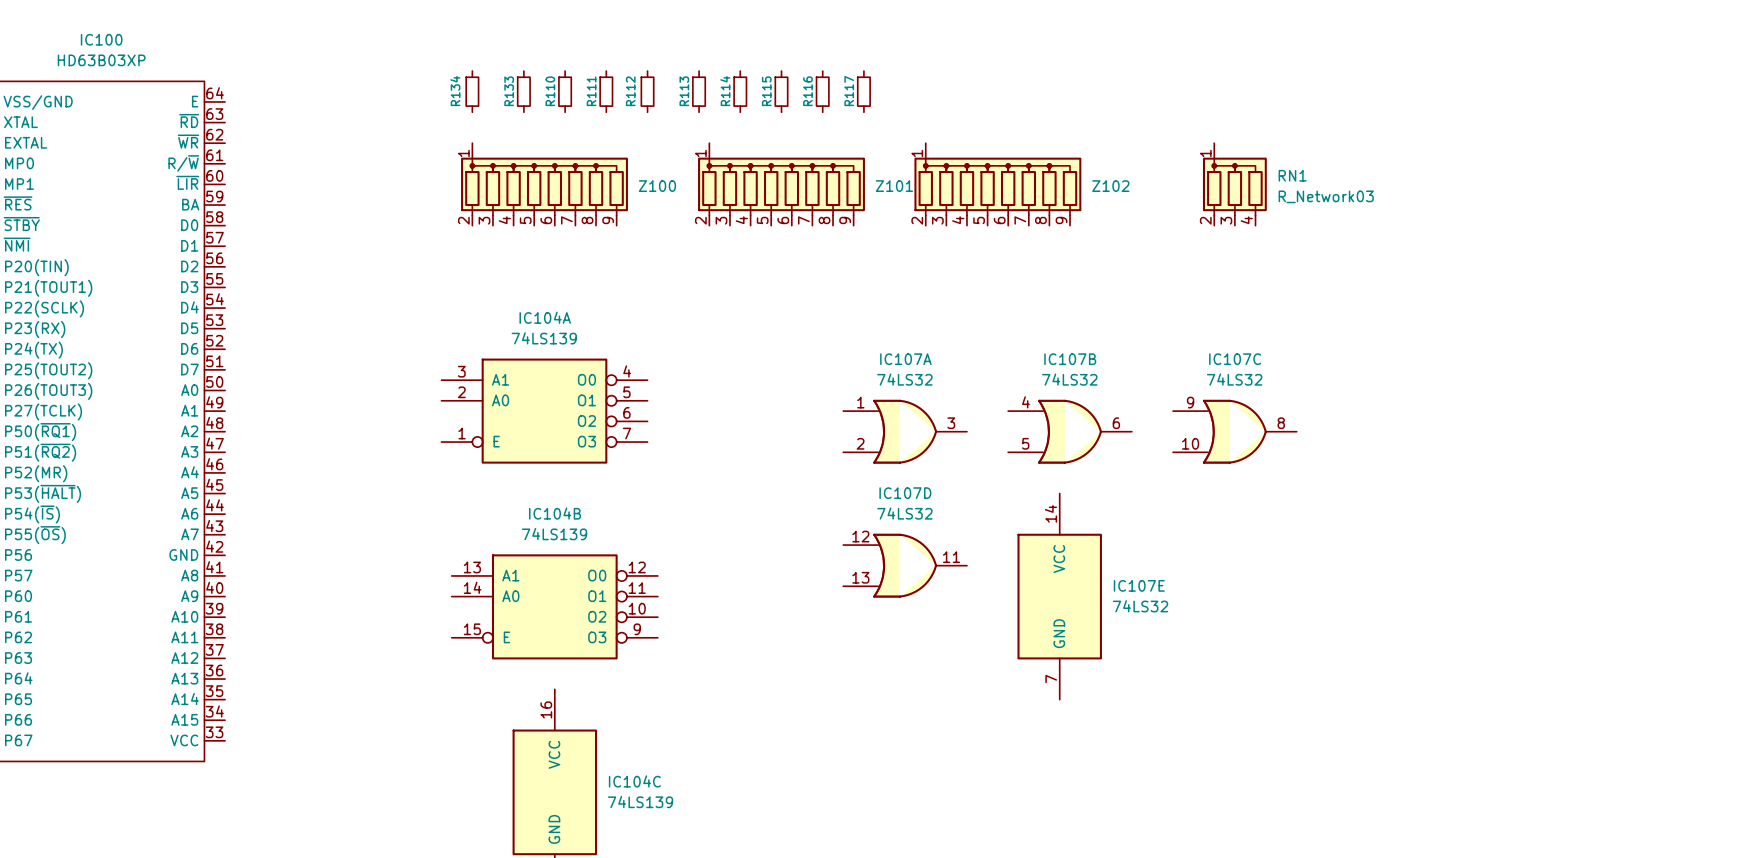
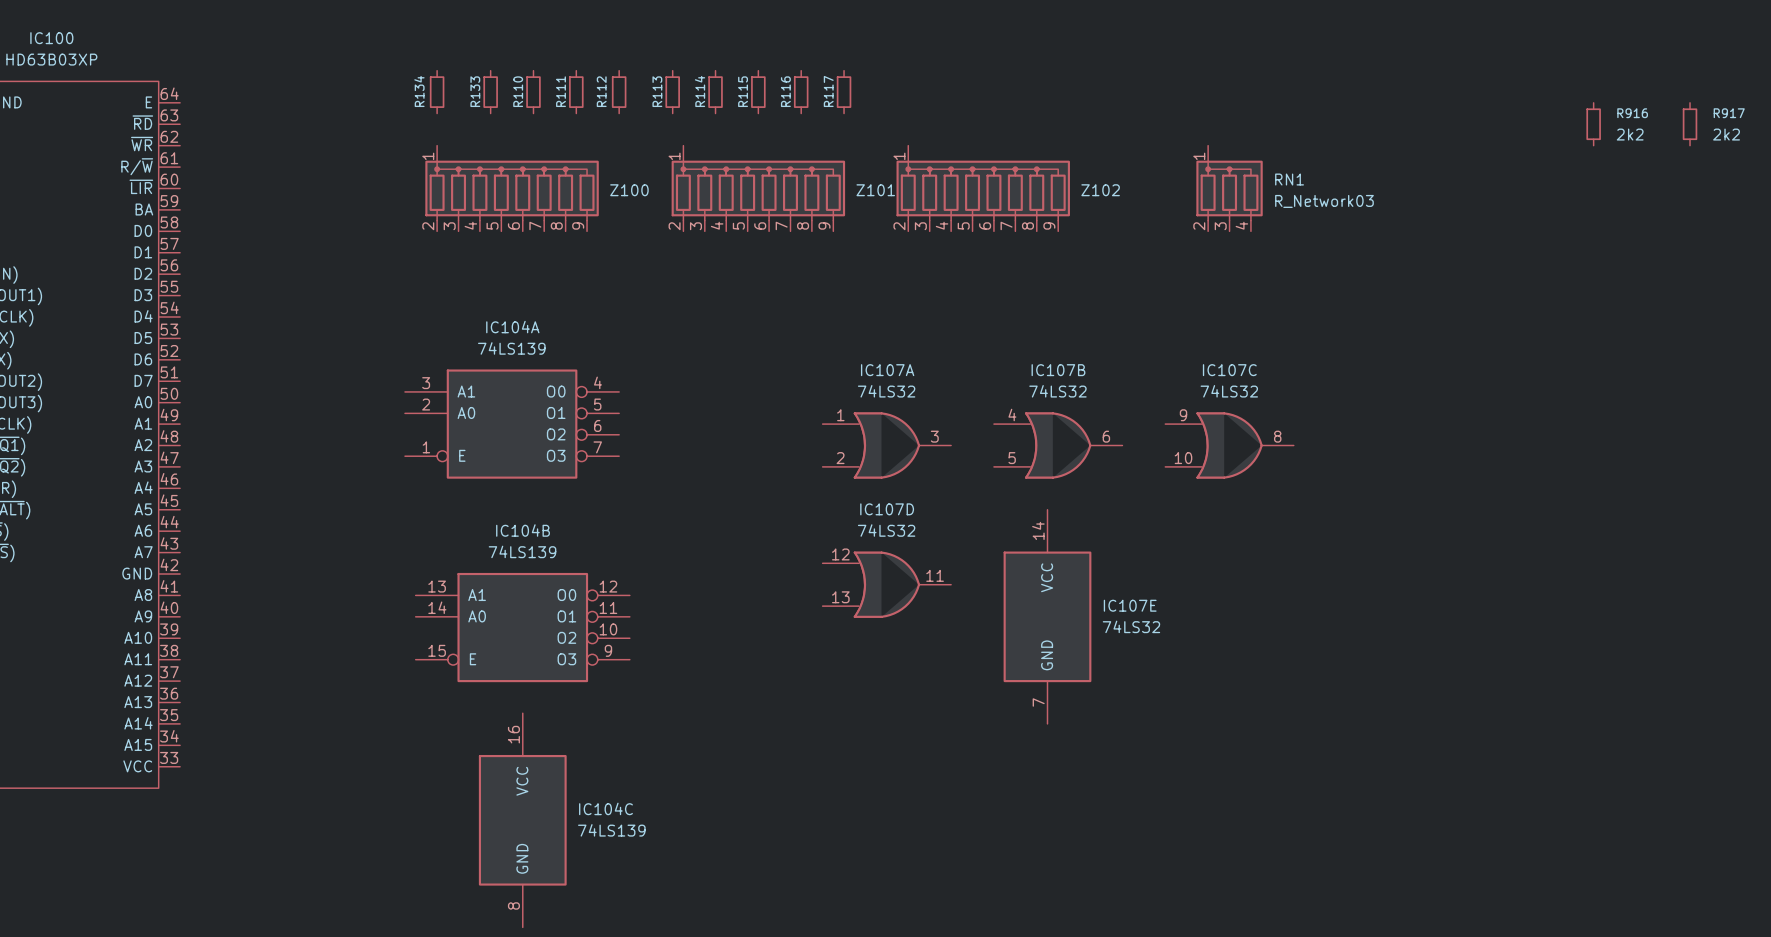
R916: none -> 2k2 (1593, 124)
R917: none -> 2k2 (1690, 124)

